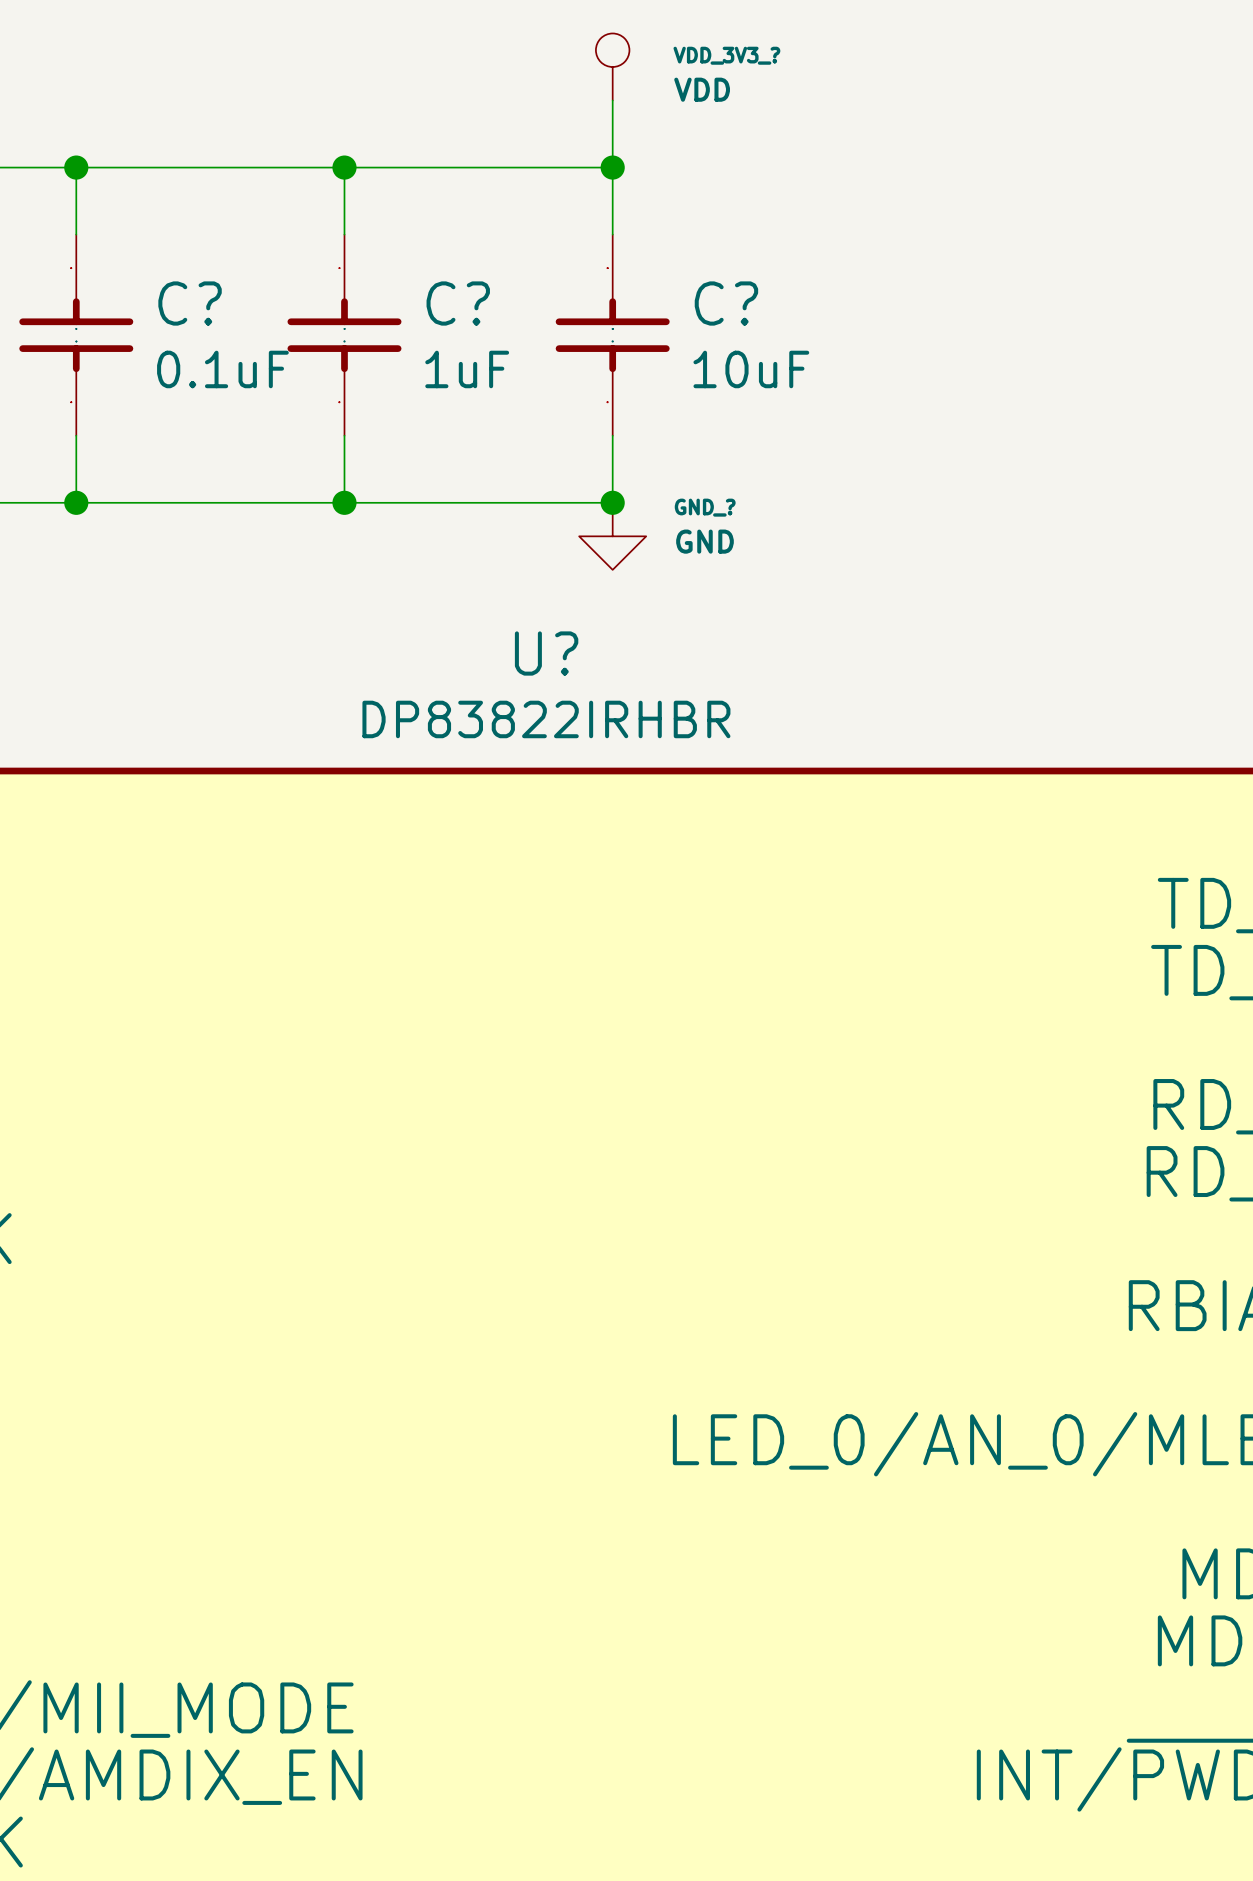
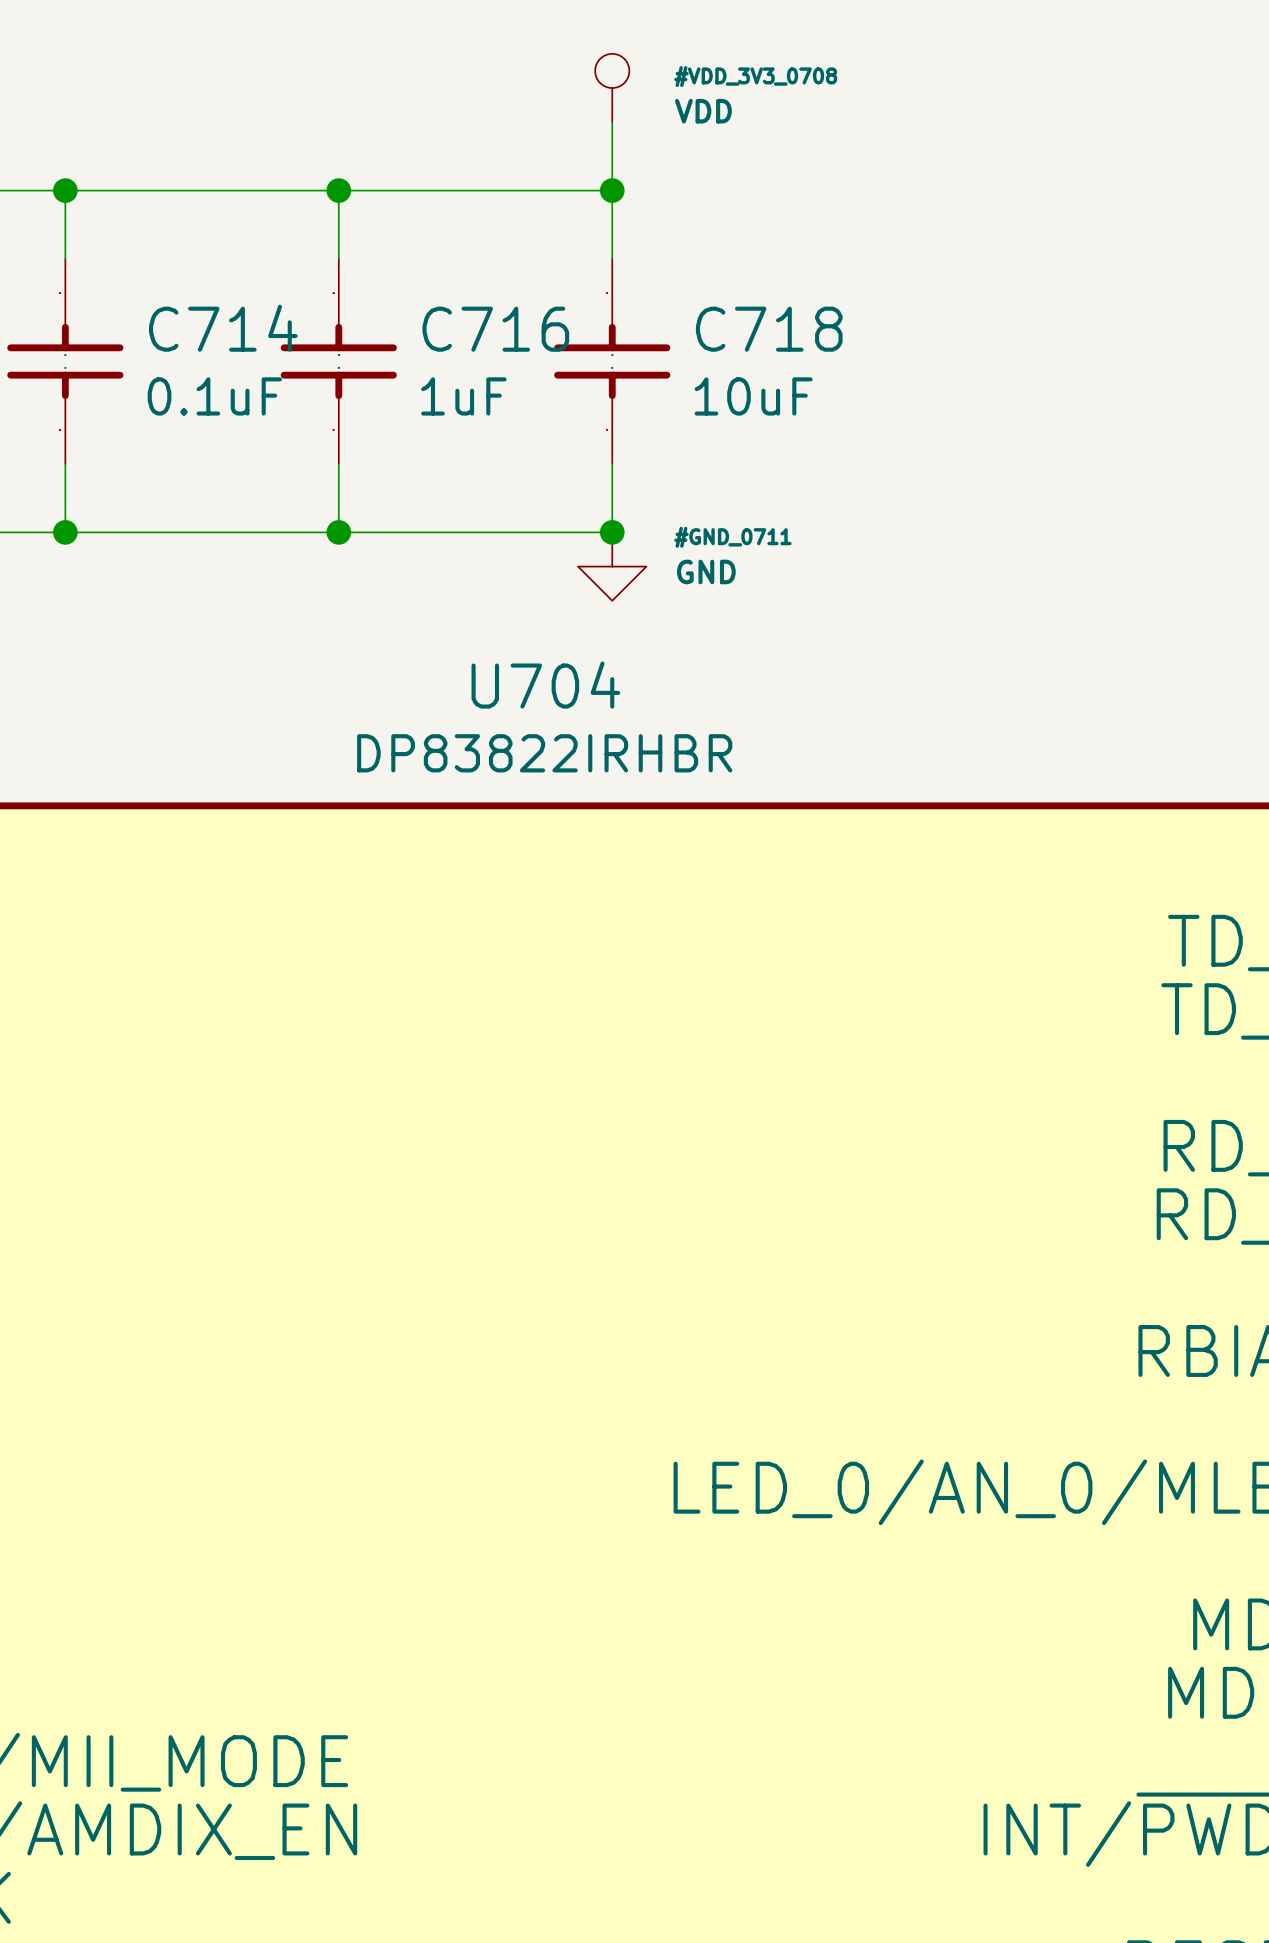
VDD_3V3_? name: VDD_3V3_? (726, 55) -> #VDD_3V3_0708 (755, 76)
C? name: C? (190, 303) -> C714 (223, 328)
C? name: C? (458, 303) -> C716 (495, 329)
C? name: C? (726, 303) -> C718 (769, 329)
GND_? name: GND_? (705, 507) -> #GND_0711 (732, 537)
U? name: U? (546, 653) -> U704 (545, 685)

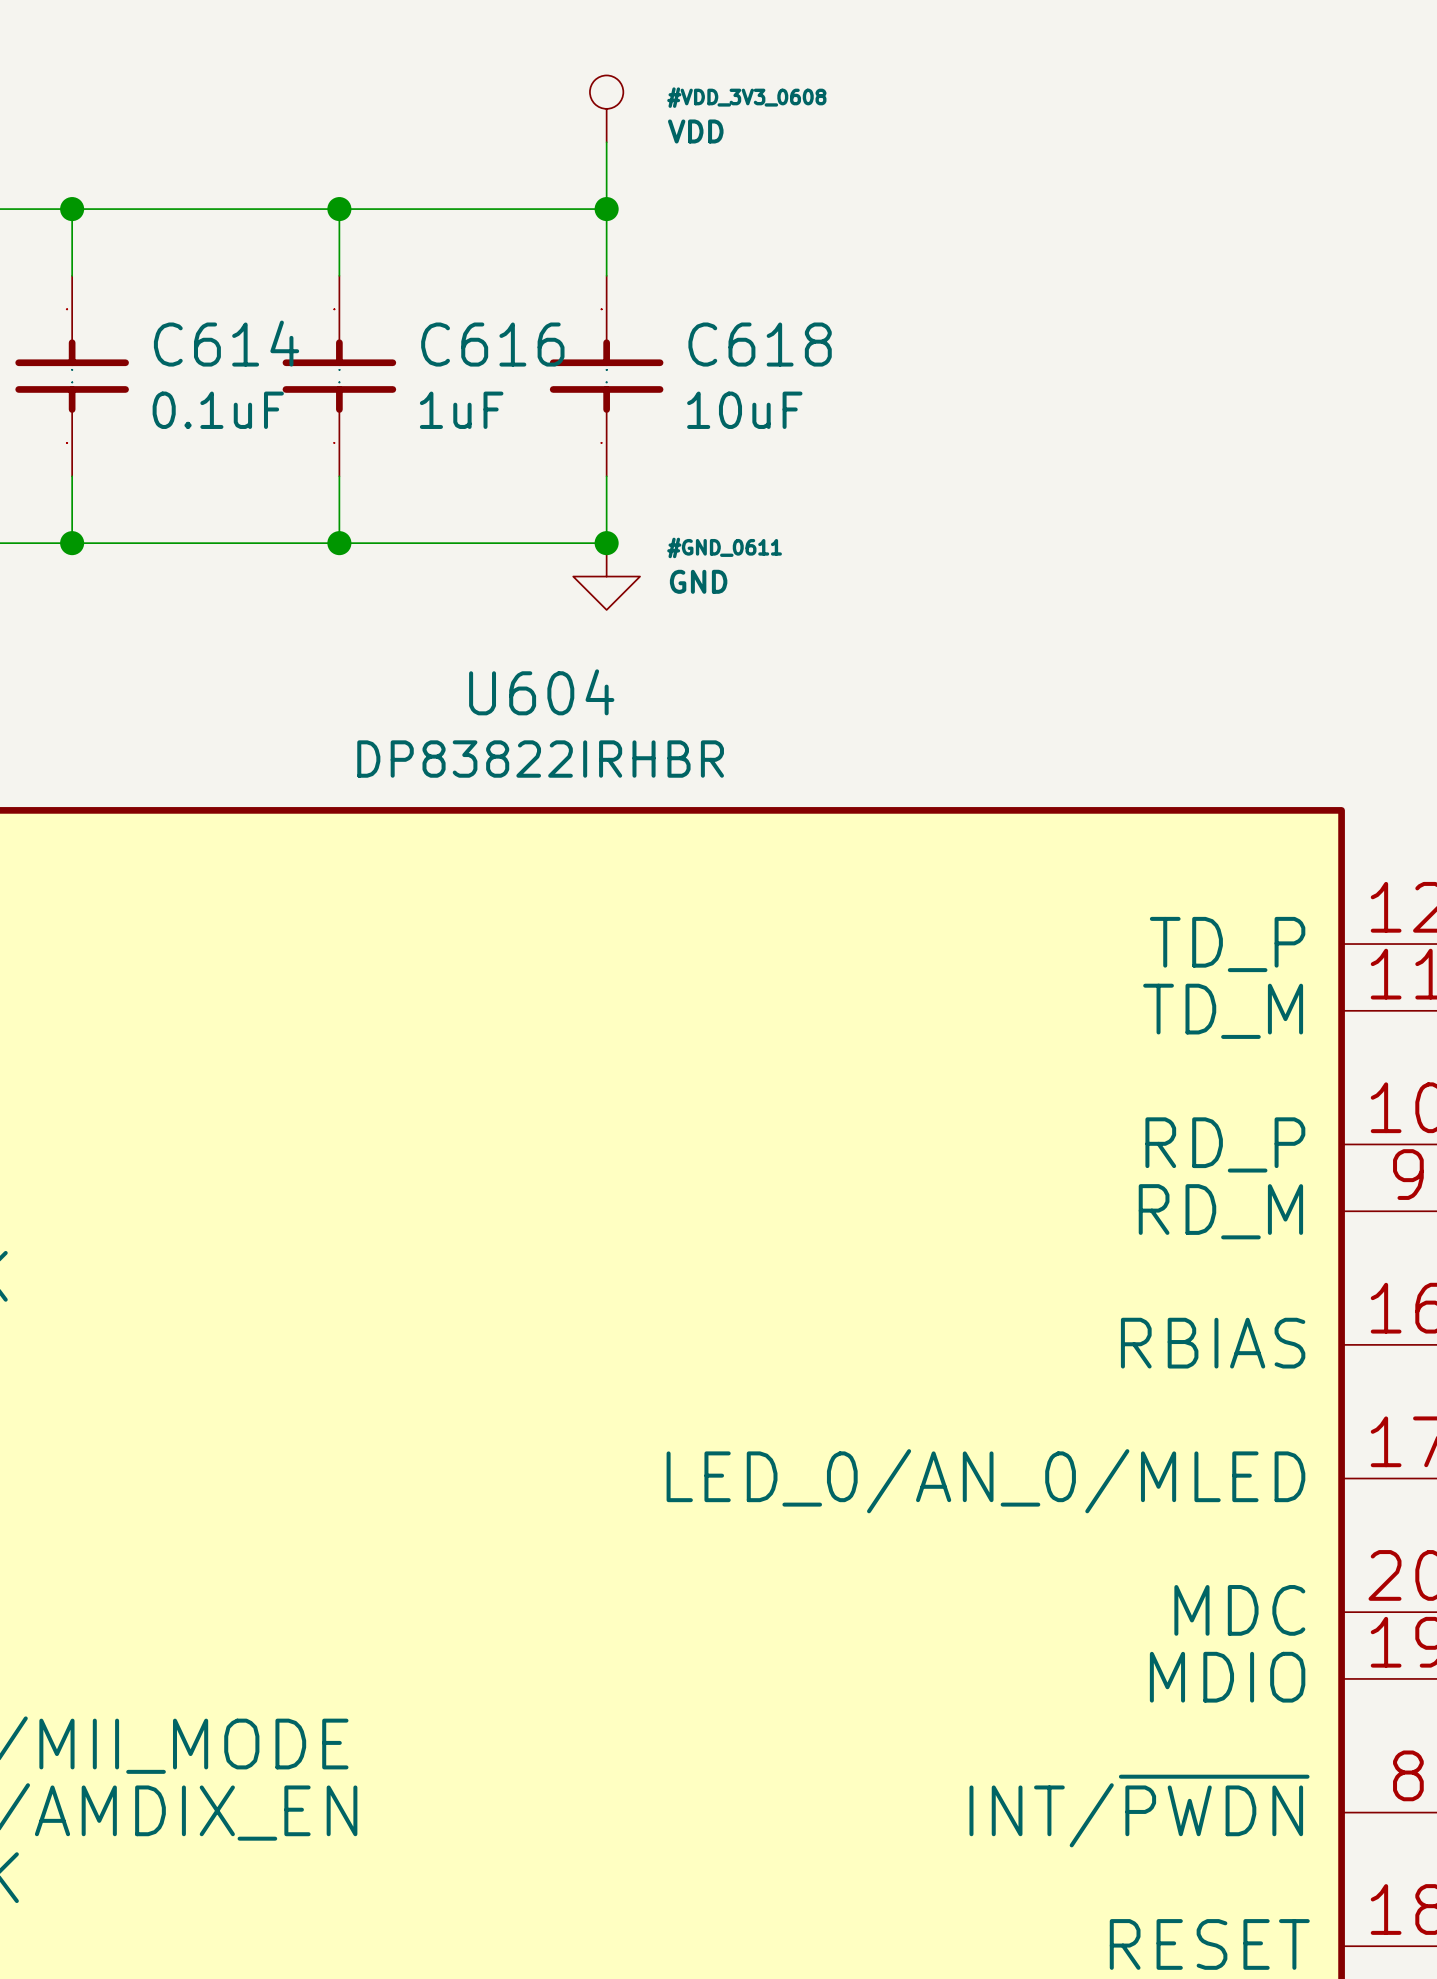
#VDD_3V3_0708 name: #VDD_3V3_0708 (755, 76) -> #VDD_3V3_0608 (746, 97)
C714 name: C714 (223, 328) -> C614 (226, 343)
C716 name: C716 (495, 329) -> C616 (492, 344)
C718 name: C718 (769, 329) -> C618 (760, 344)
#GND_0711 name: #GND_0711 (732, 537) -> #GND_0611 (724, 547)
U704 name: U704 (545, 685) -> U604 (541, 692)

